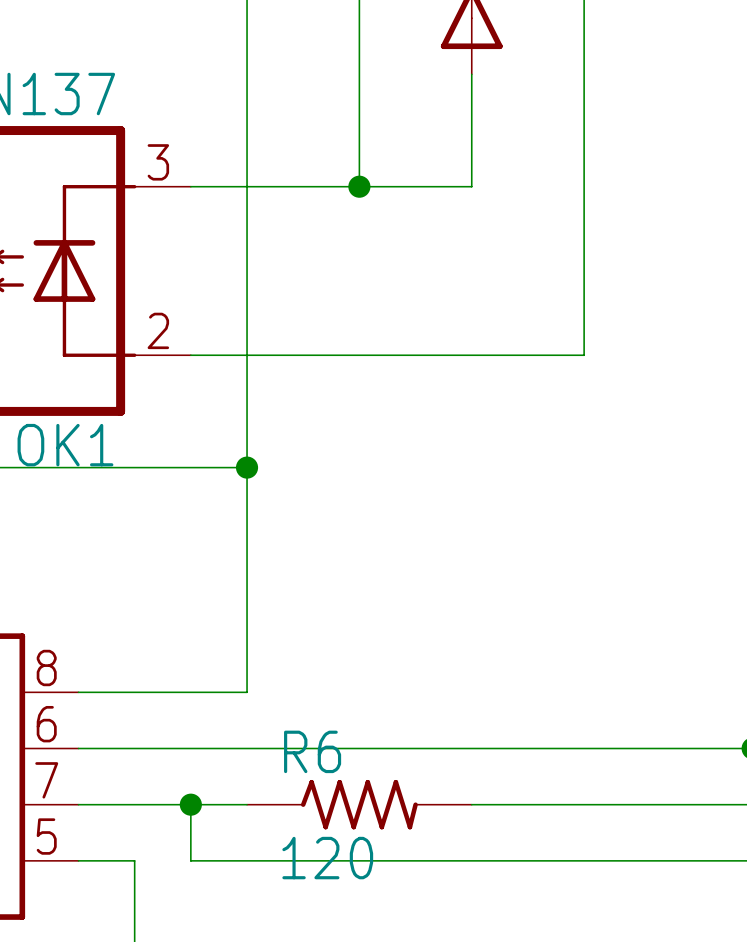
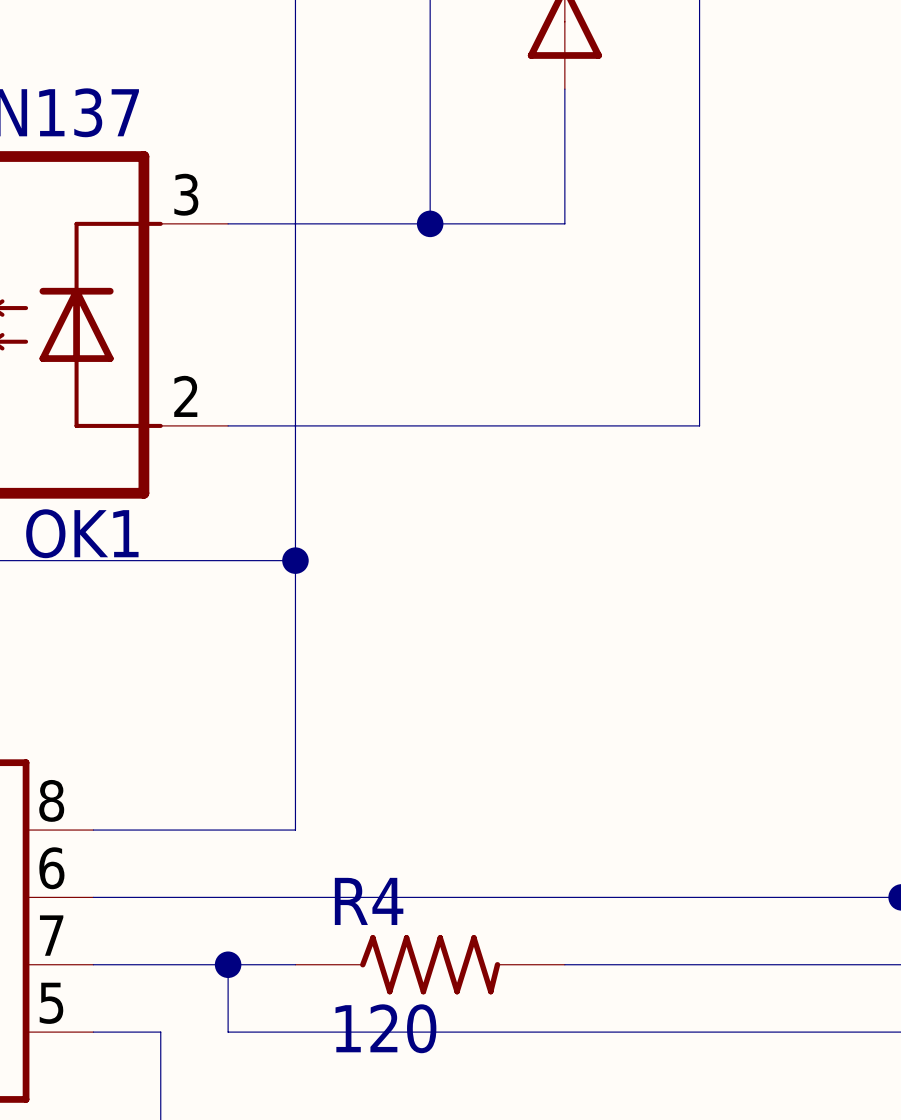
R6 name: R6 (312, 751) -> R4 (369, 901)

